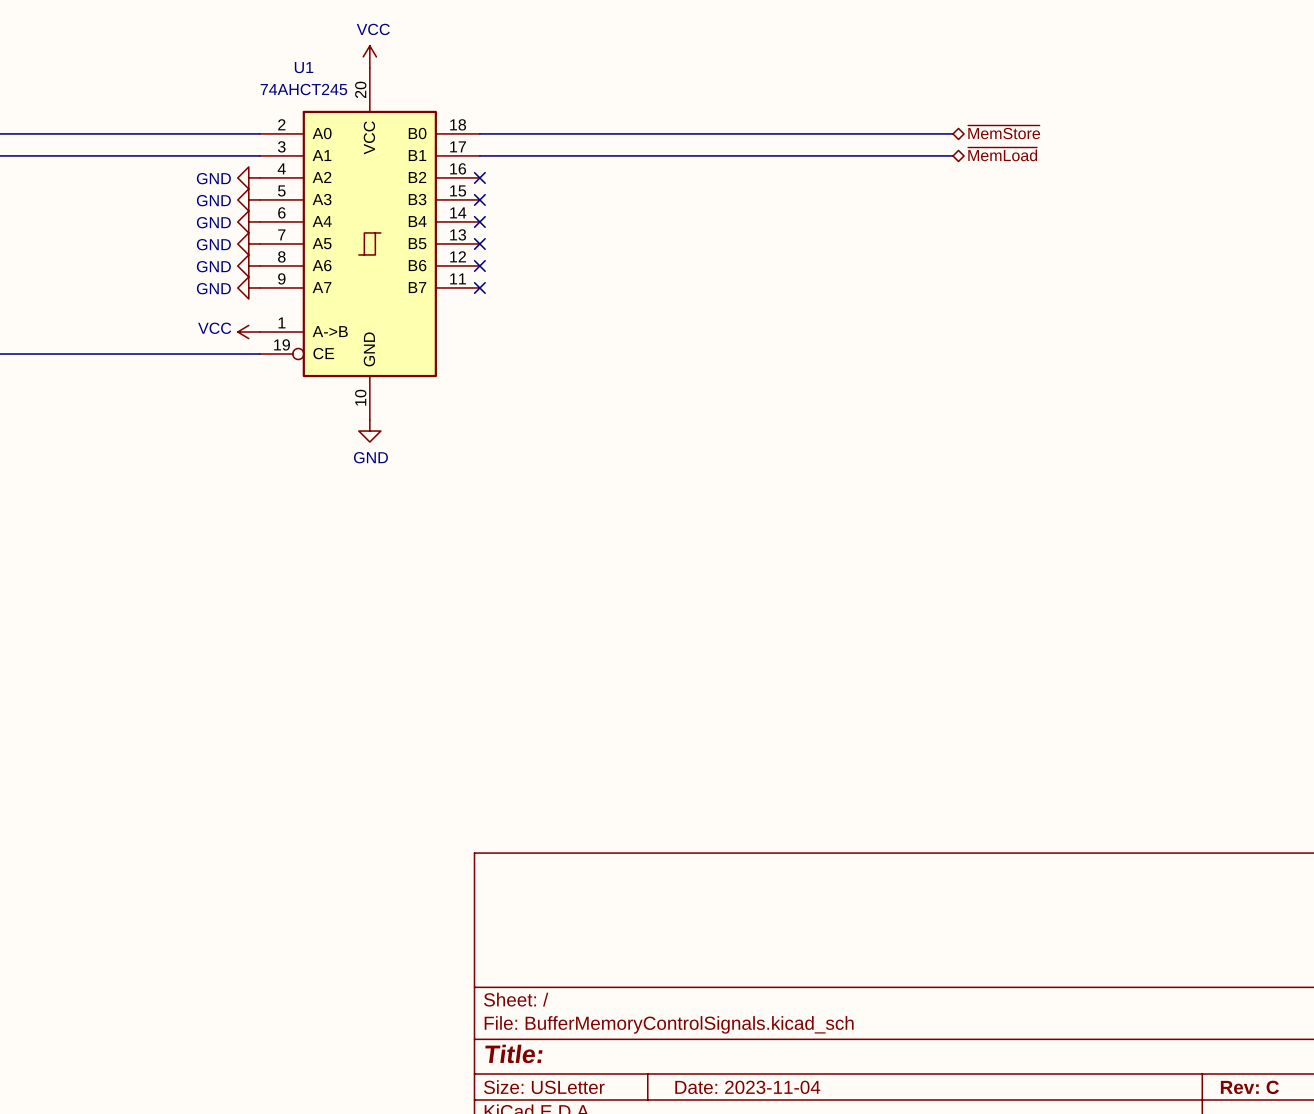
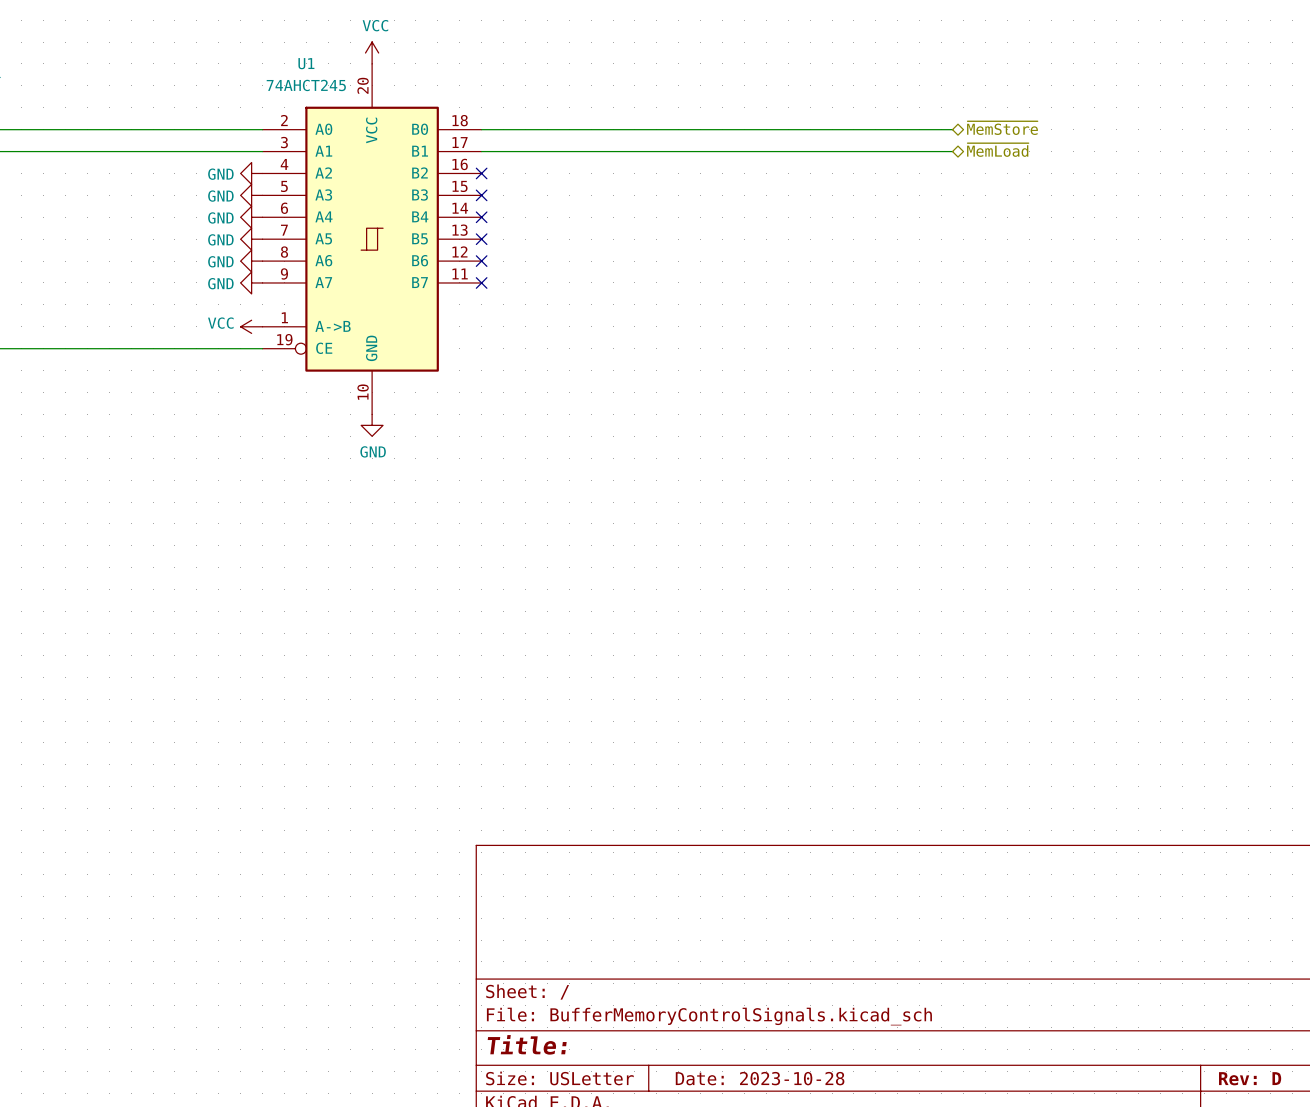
title block: Date: 2023-11-04 (747, 1087) -> Date: 2023-10-28 (760, 1078)
title block: Rev: C (1249, 1087) -> Rev: D (1250, 1078)

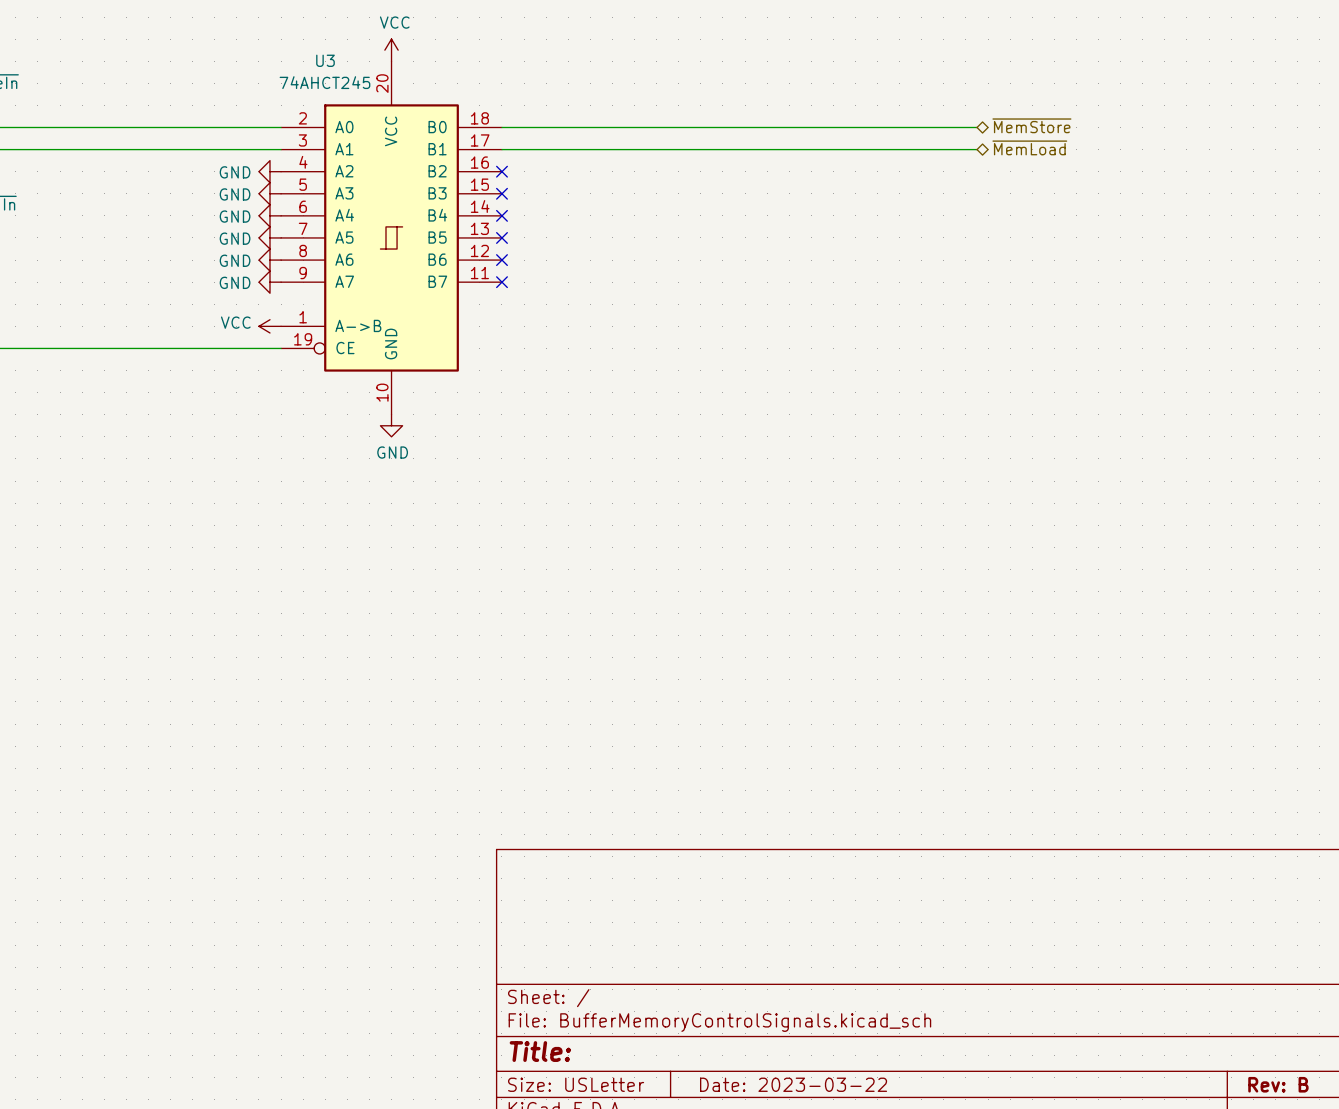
U1 name: U1 (306, 63) -> U3 (325, 60)
title block: Date: 2023-10-28 (760, 1078) -> Date: 2023-03-22 (793, 1084)
title block: Rev: D (1250, 1078) -> Rev: B (1278, 1084)

